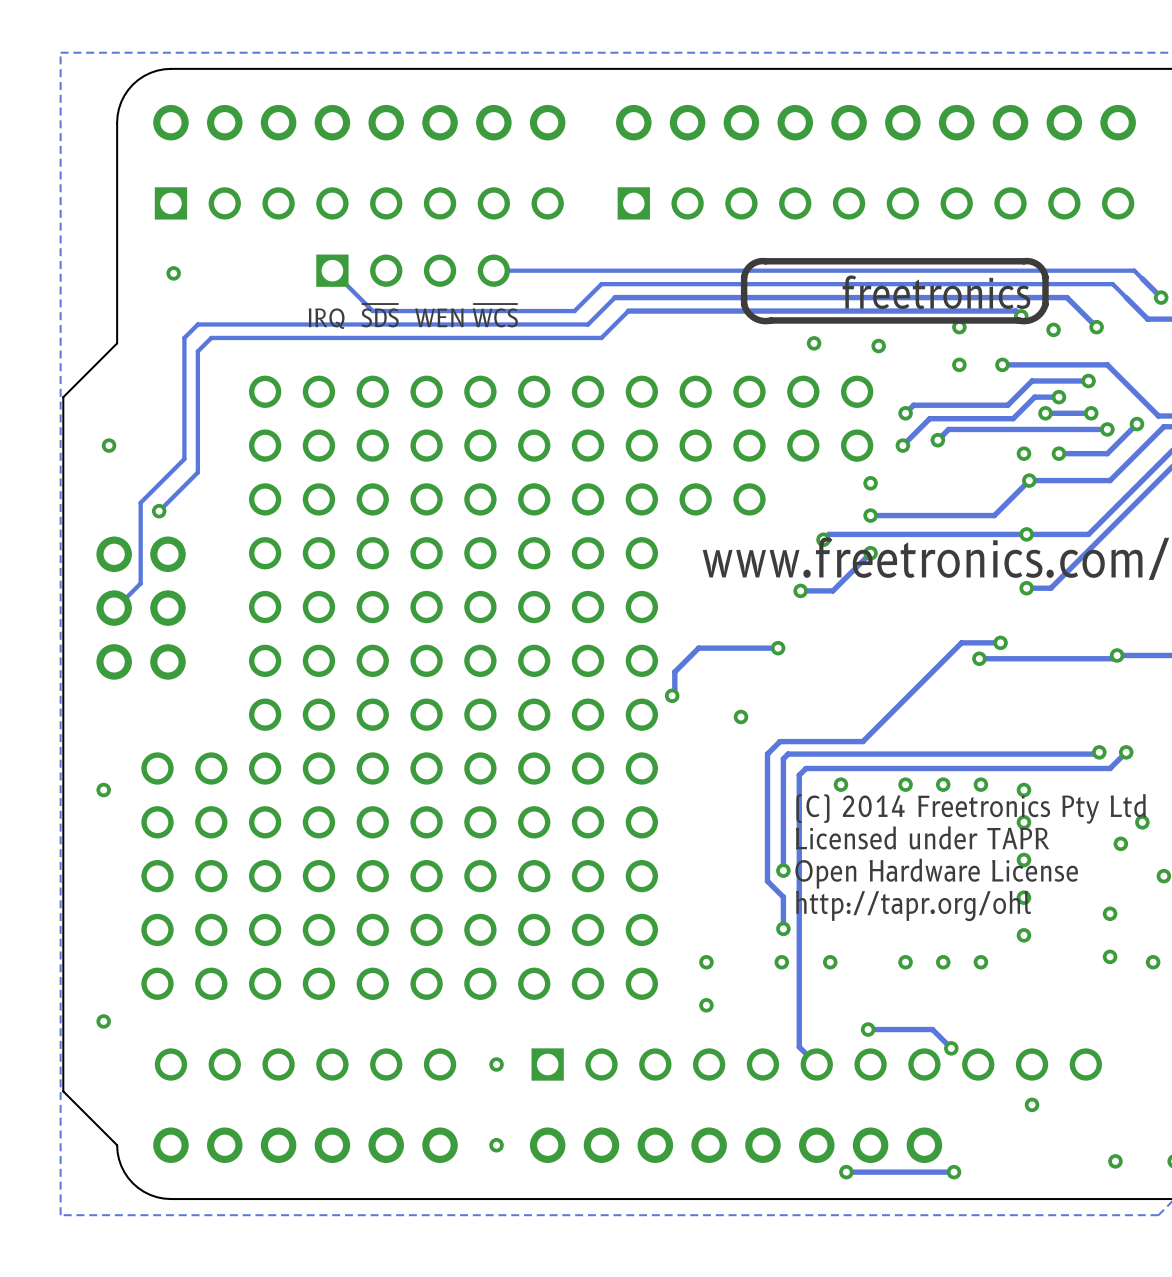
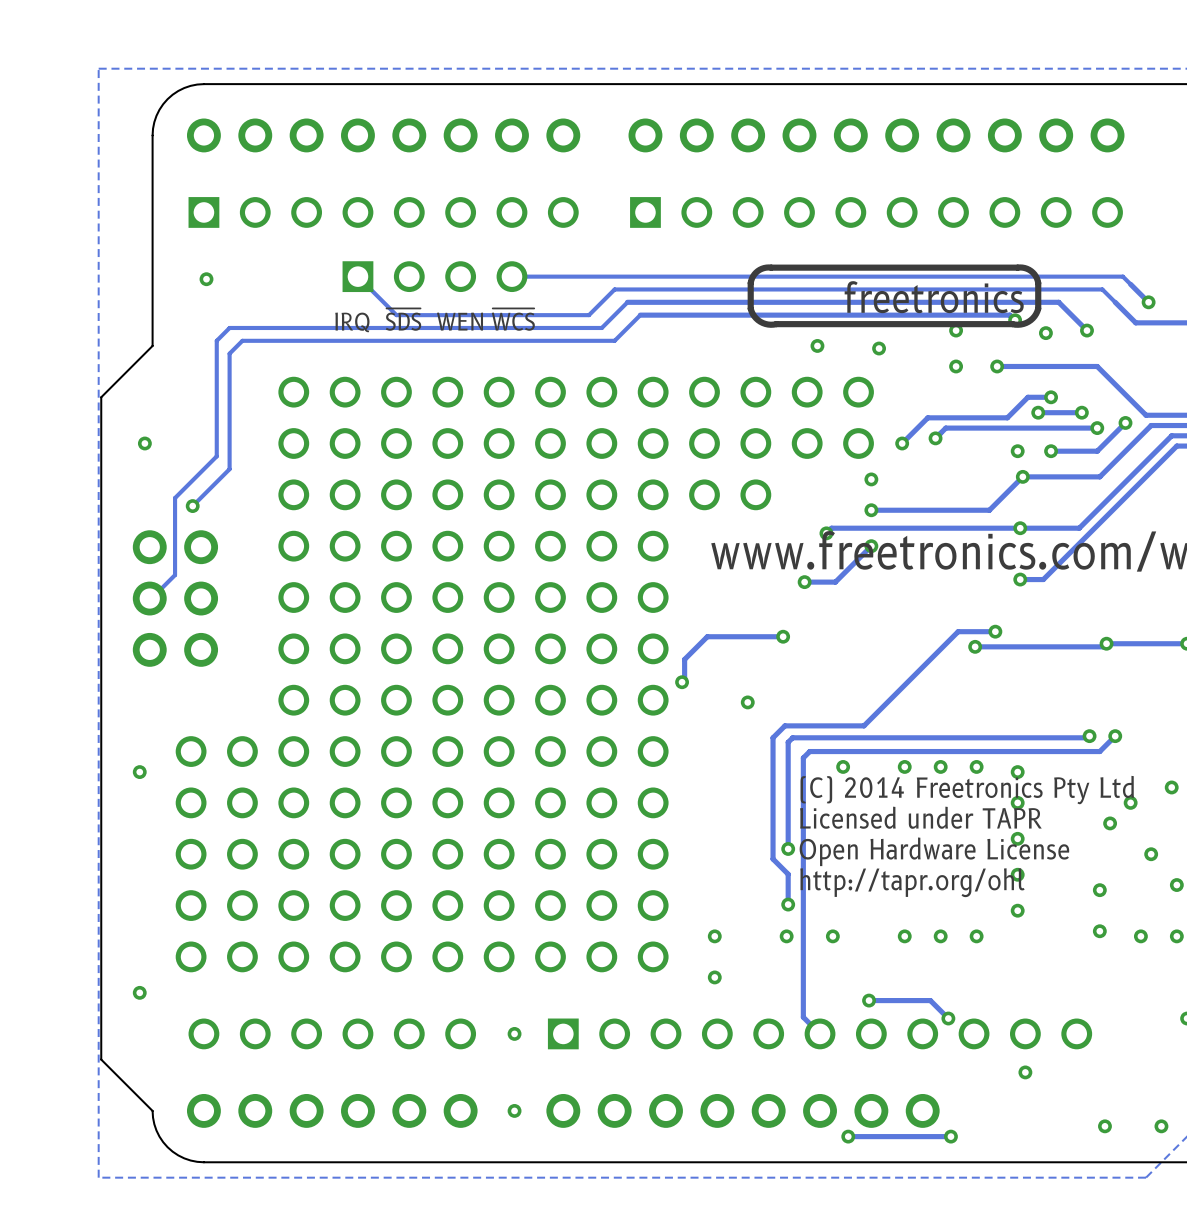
track: (1088, 381) (1032, 381) (1007, 405) (913, 405) (905, 413) -> none
via: (1088, 381) -> none
via: (905, 413) -> none

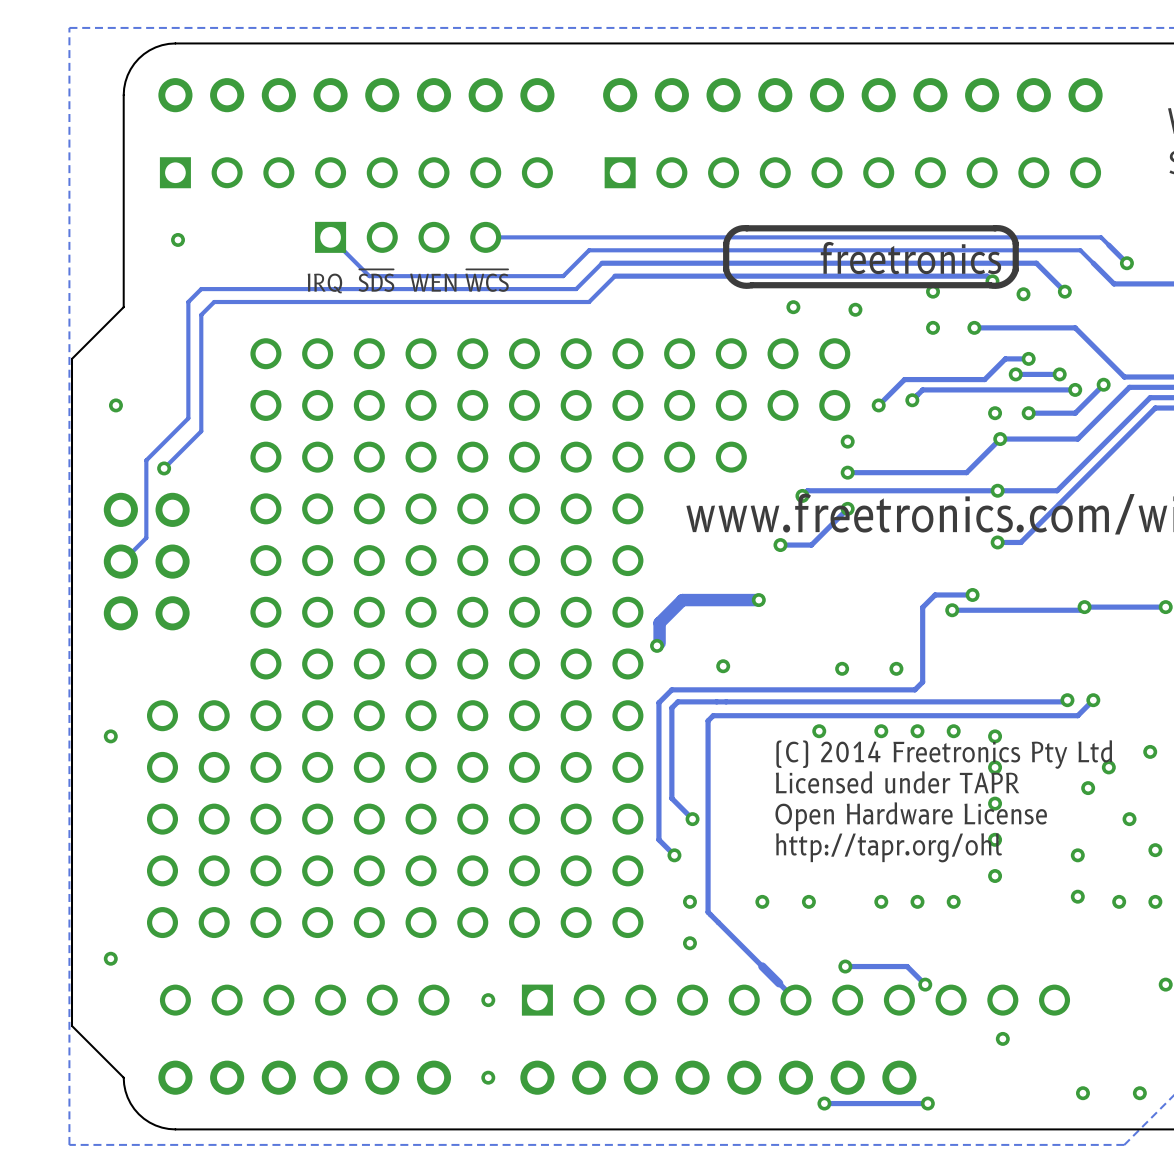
track width: thin (783, 636) (707, 636) (684, 659) (684, 679) -> thick (758, 600) (682, 600) (659, 622) (659, 643)
track: (945, 644) (863, 725) -> (922, 607) (922, 682) (914, 689) (840, 689)
via: none -> (842, 668)
via: none -> (896, 668)
track: (784, 725) (773, 737) (773, 859) (788, 874) (788, 904) -> (760, 689) (671, 689) (658, 702) (658, 839) (674, 855)
track: (792, 737) (788, 742) (788, 848) -> (768, 701) (677, 701) (671, 707) (671, 798) (692, 819)
track: (809, 751) (803, 757) (803, 1017) -> (785, 715) (713, 715) (708, 720) (708, 912) (779, 983)
via: (788, 848) -> none
via: none -> (692, 819)
via: none -> (674, 855)
via: (788, 904) -> none

